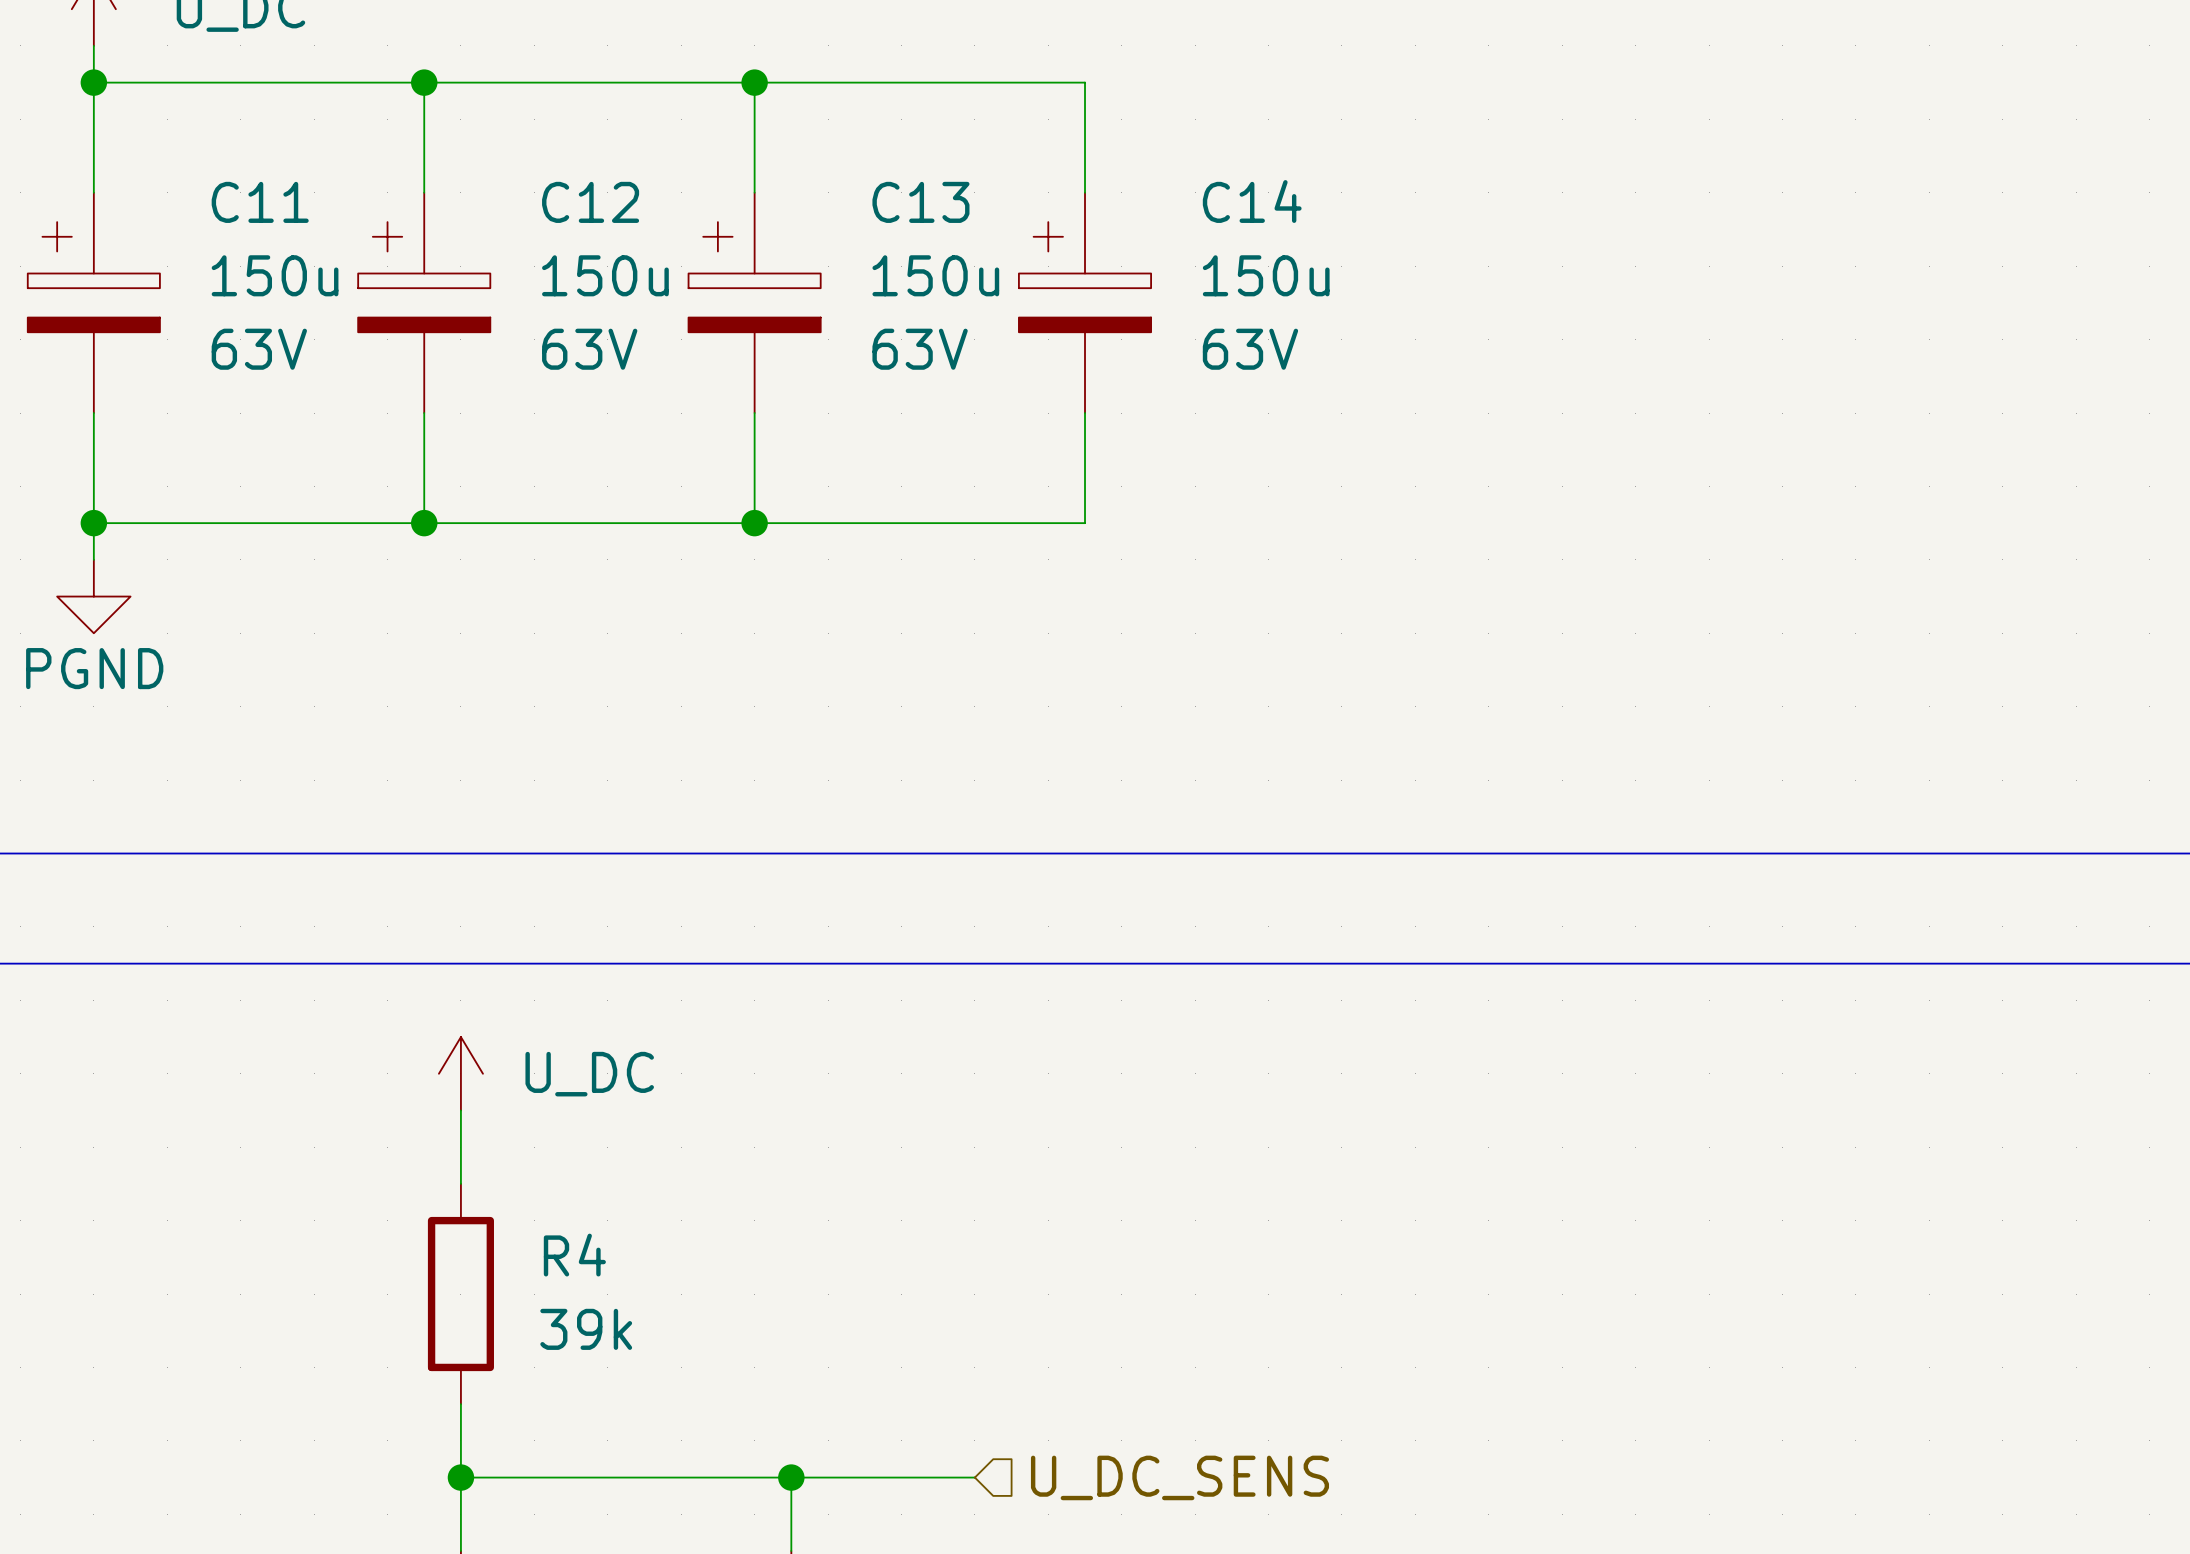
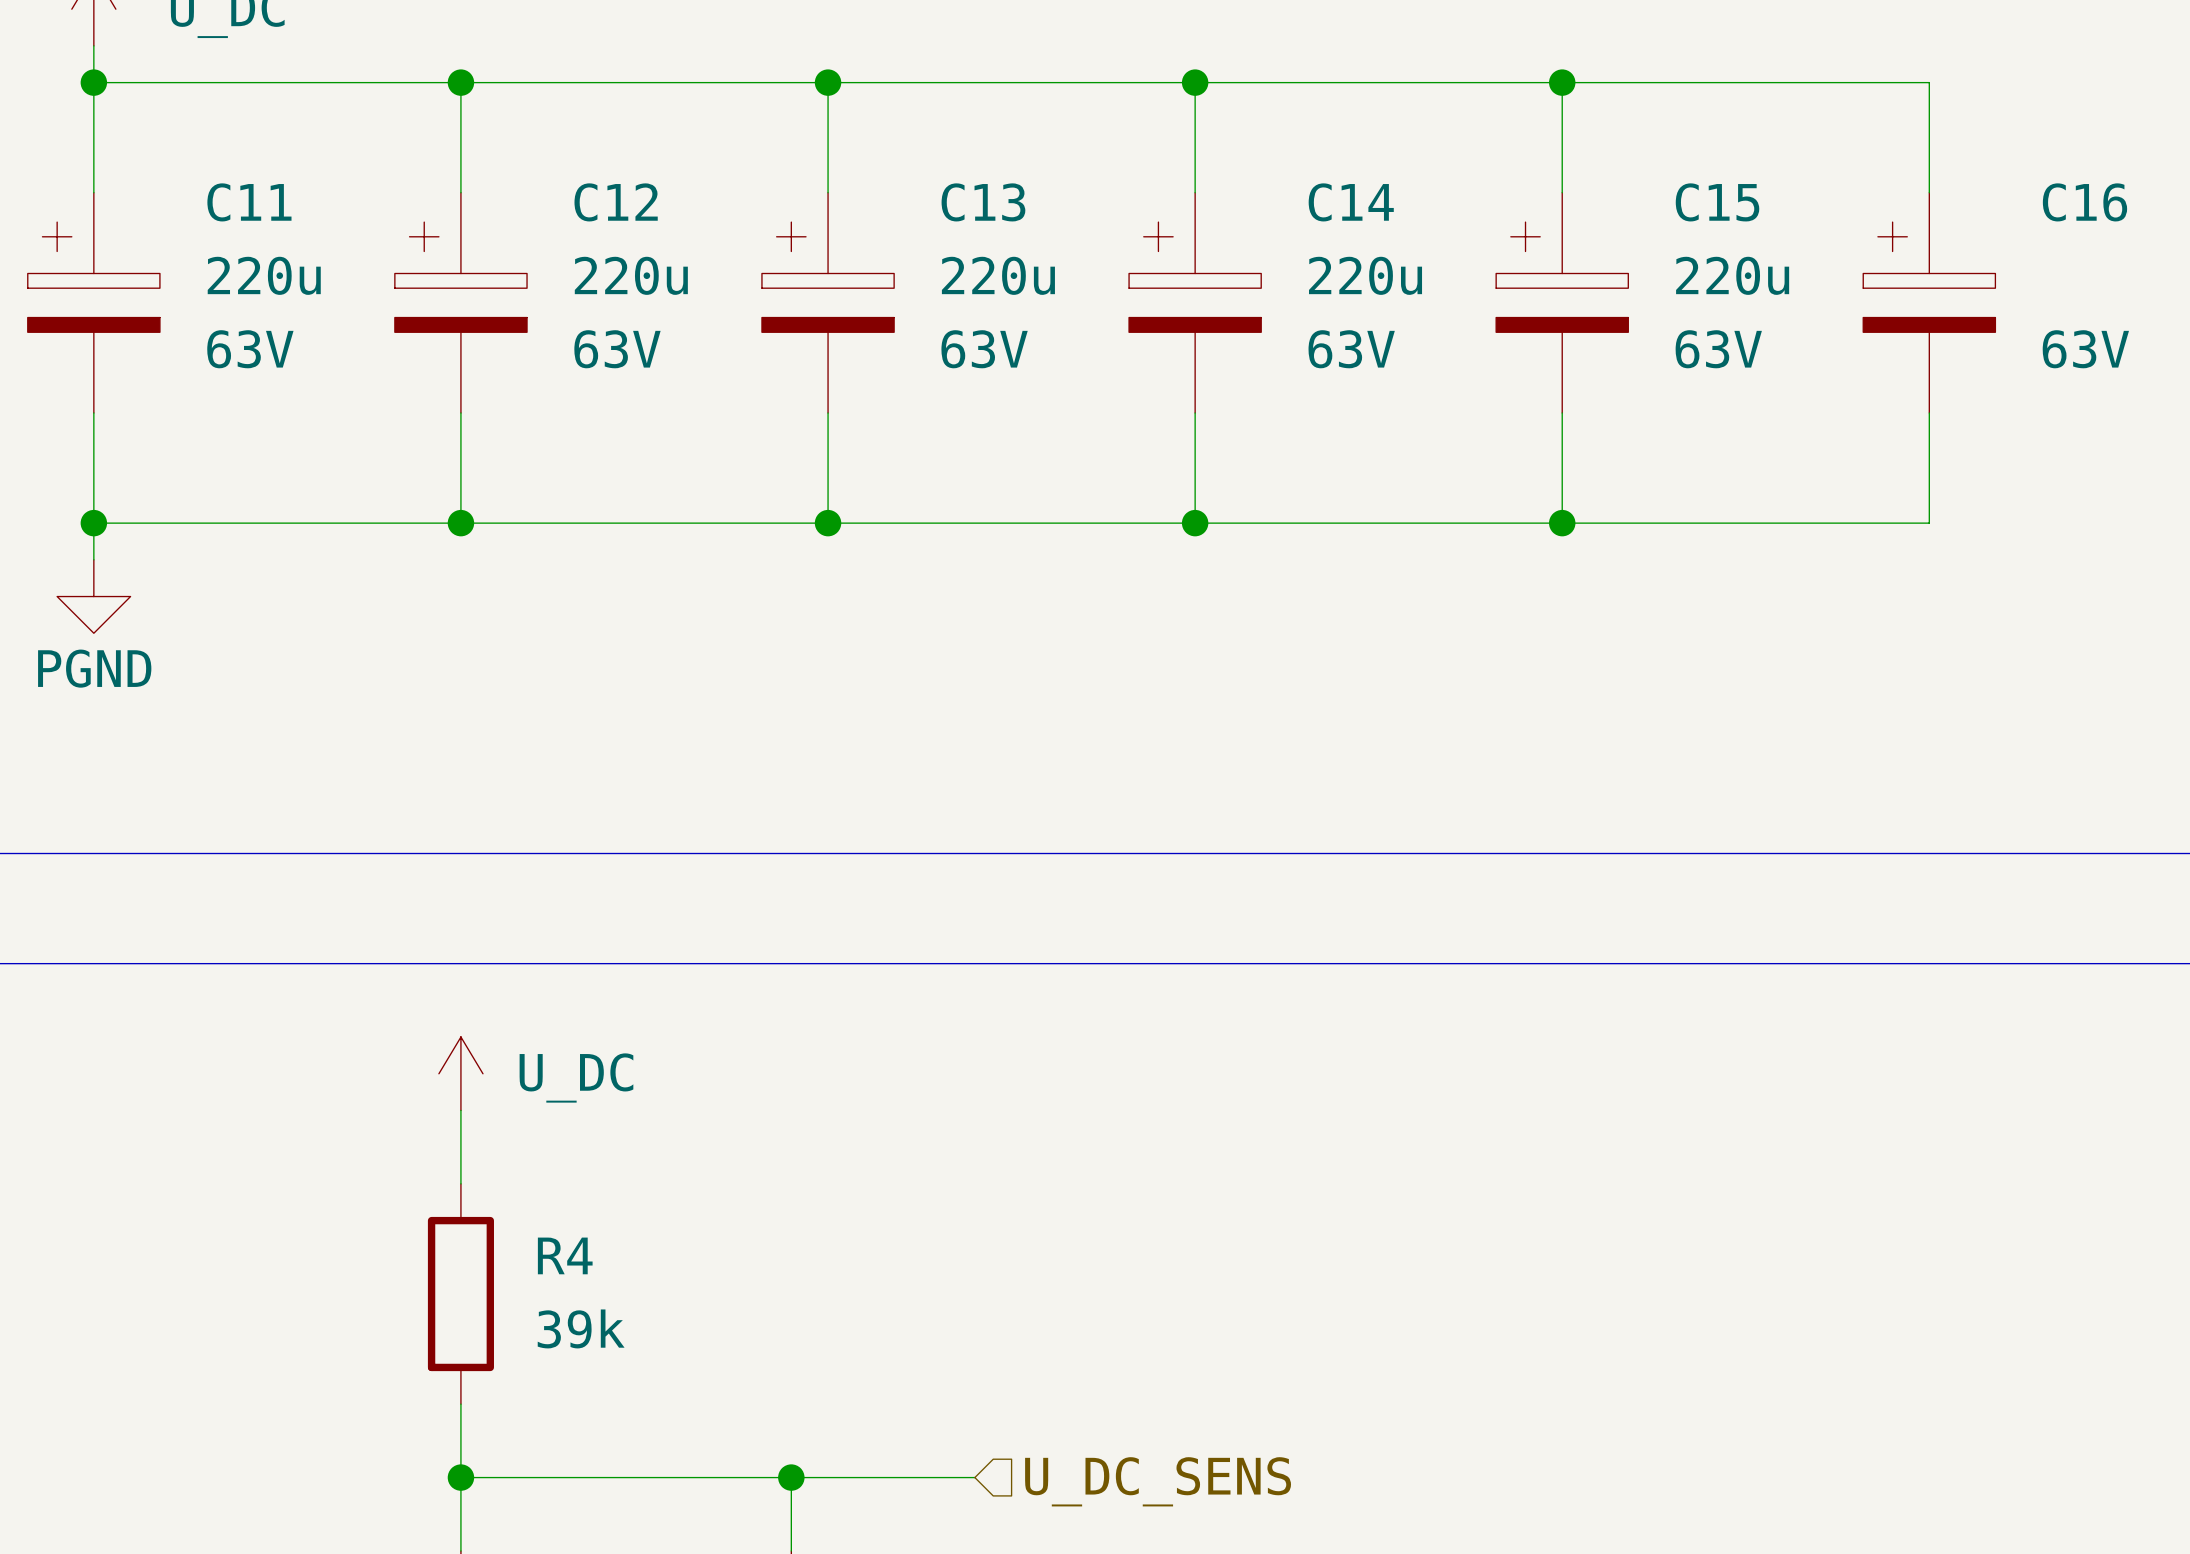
wire: (424, 82) (424, 192) -> (460, 82) (460, 192)
junction position: (424, 82) -> (460, 82)
wire: (754, 82) (754, 192) -> (828, 82) (828, 192)
junction position: (754, 82) -> (828, 82)
wire: (1085, 82) (1085, 192) -> (1085, 82) (1929, 82) (1929, 192)
wire: none -> (1195, 82) (1195, 192)
junction: none -> (1195, 82)
wire: none -> (1562, 82) (1562, 192)
junction: none -> (1562, 82)
C11 value: 150u (275, 275) -> 220u (264, 275)
C12 value: 150u (605, 275) -> 220u (631, 275)
C13 value: 150u (935, 275) -> 220u (998, 275)
C14 value: 150u (1266, 275) -> 220u (1365, 275)
C12 position: (424, 302) -> (460, 302)
C13 position: (754, 302) -> (828, 302)
C14 position: (1085, 302) -> (1195, 302)
C15: none -> 220u (1562, 302)
C16: none -> (1929, 302)
wire: (424, 413) (424, 523) -> (460, 413) (460, 523)
wire: (754, 413) (754, 523) -> (828, 413) (828, 523)
wire: (1085, 413) (1085, 523) -> (1929, 413) (1929, 523) (1085, 523)
wire: none -> (1195, 413) (1195, 523)
wire: none -> (1562, 413) (1562, 523)
junction position: (424, 523) -> (460, 523)
junction position: (754, 523) -> (828, 523)
junction: none -> (1195, 523)
junction: none -> (1562, 523)

